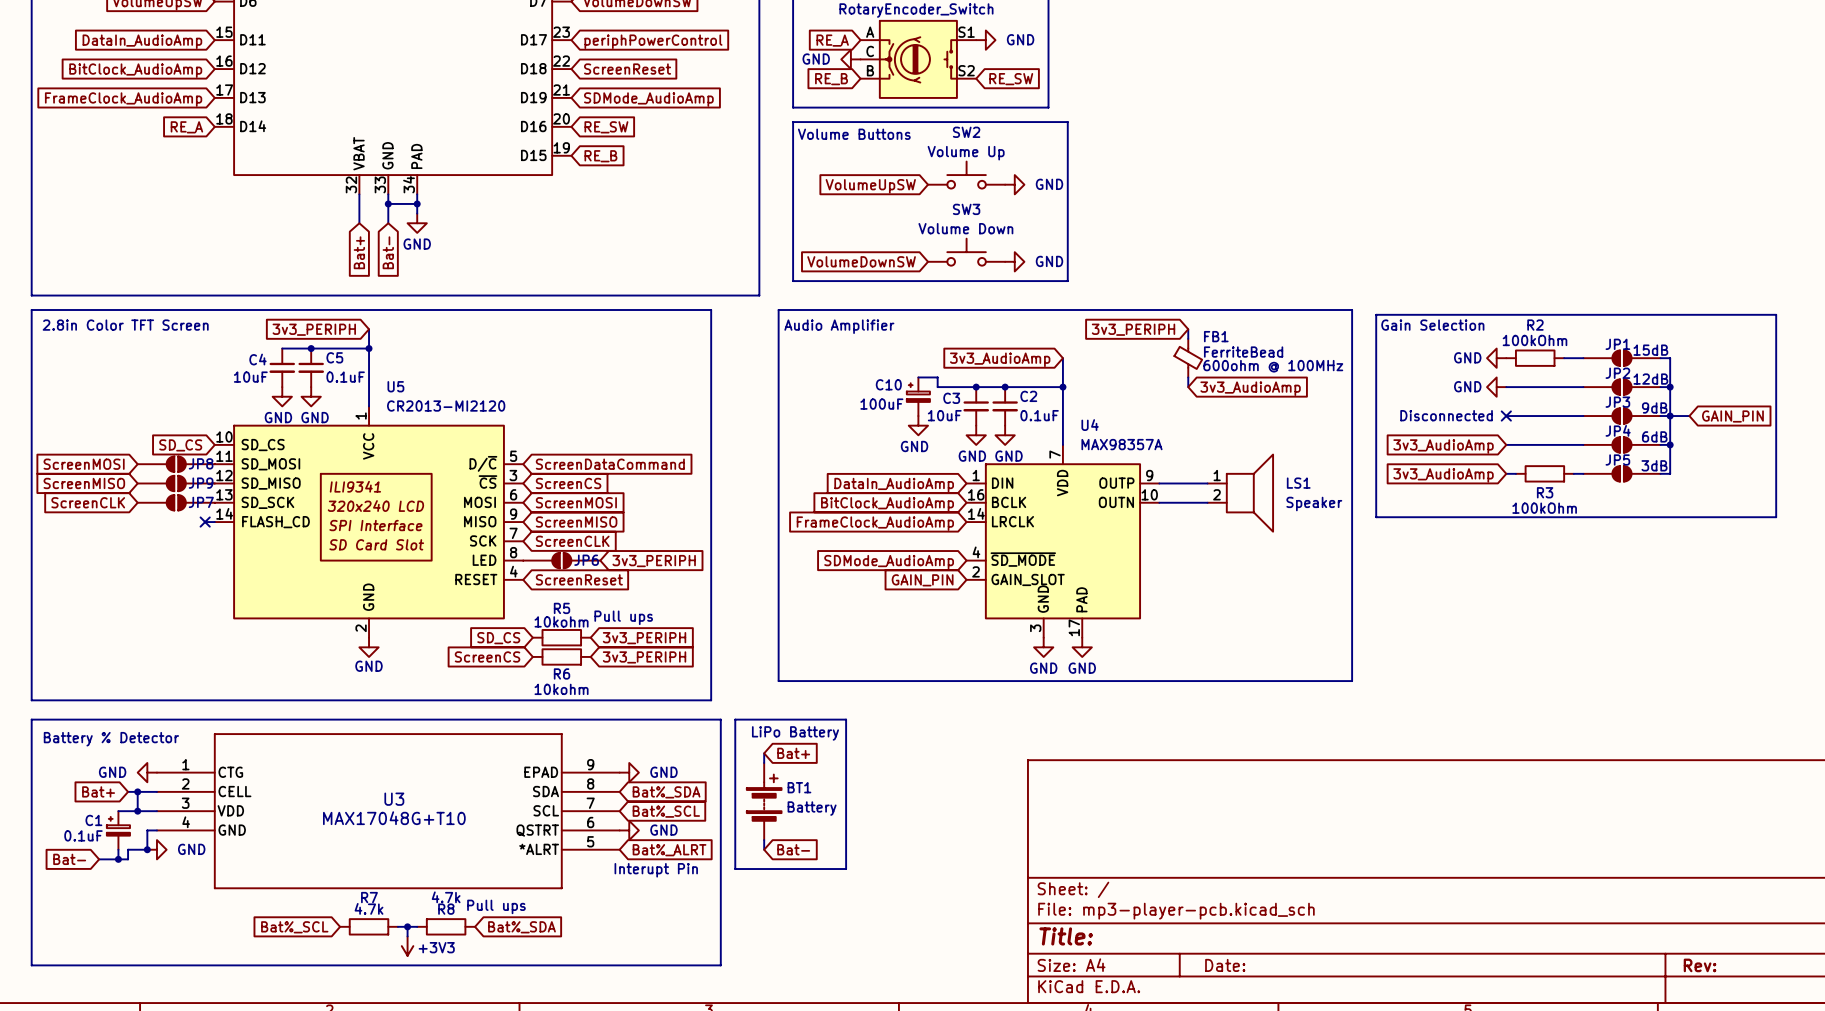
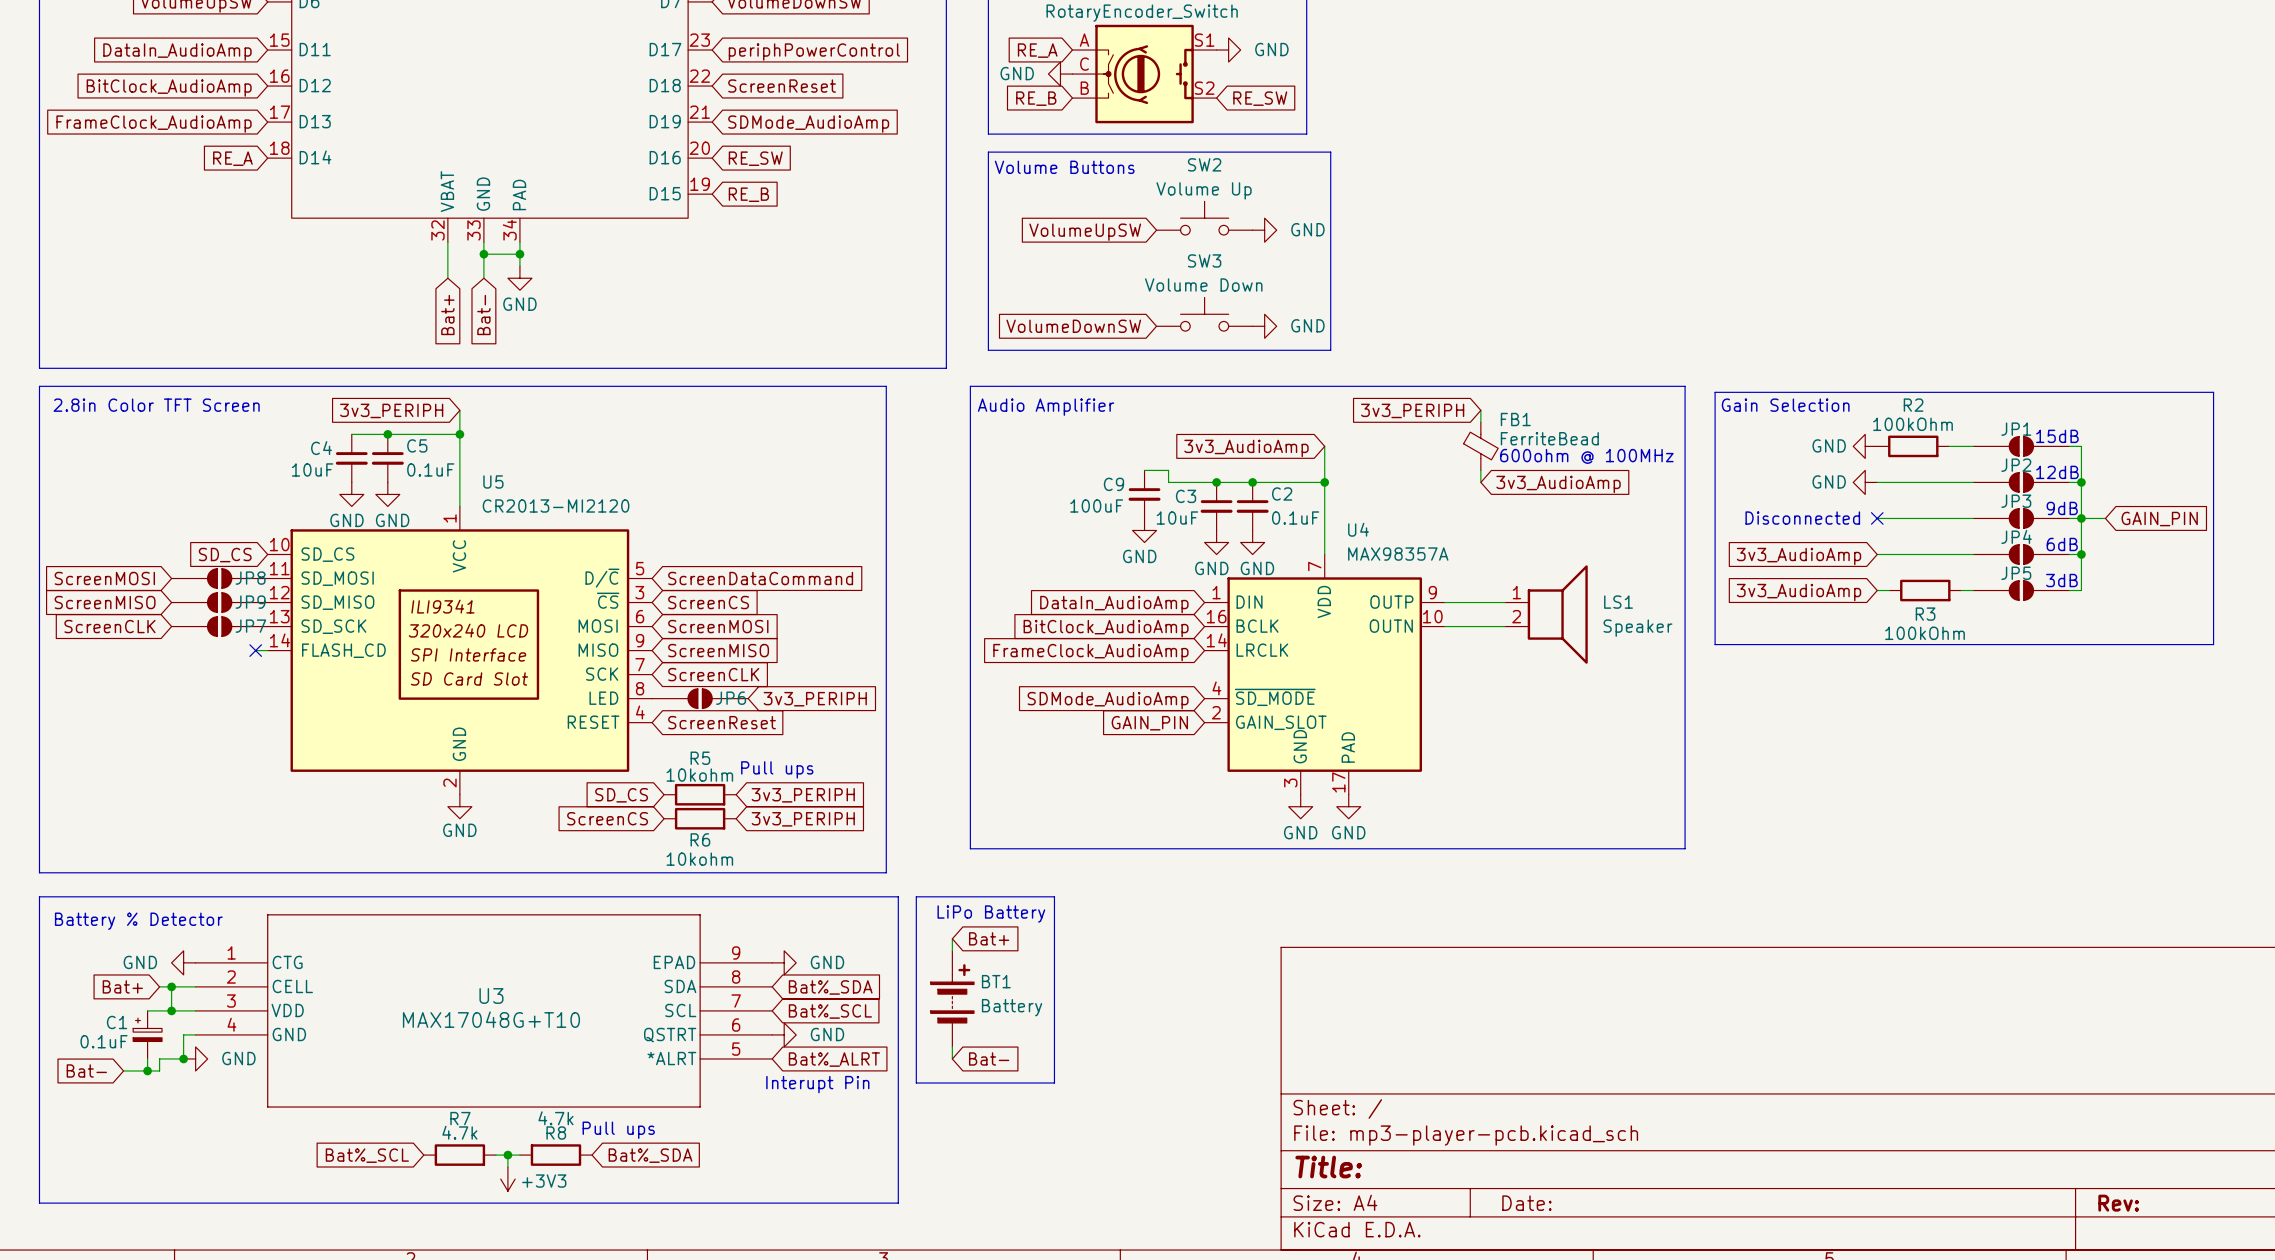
C10: 100uF (918, 396) -> none
C9: none -> 100uF (1144, 494)

